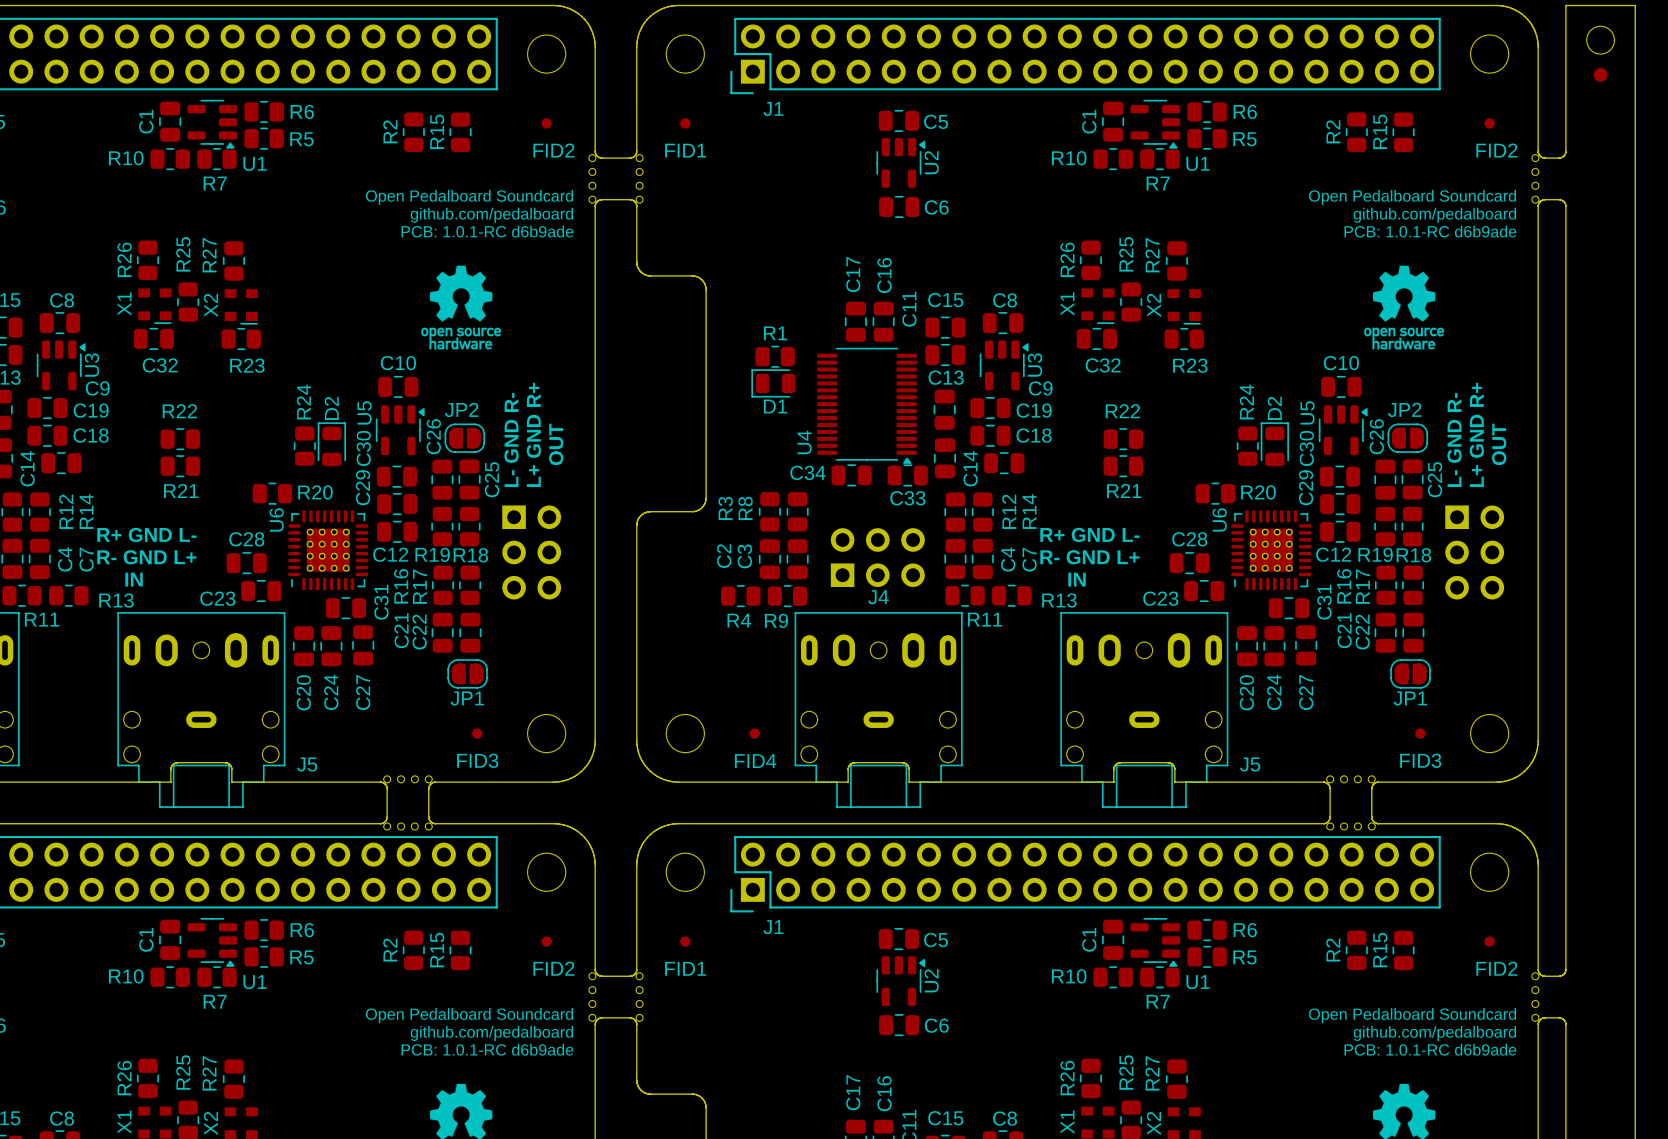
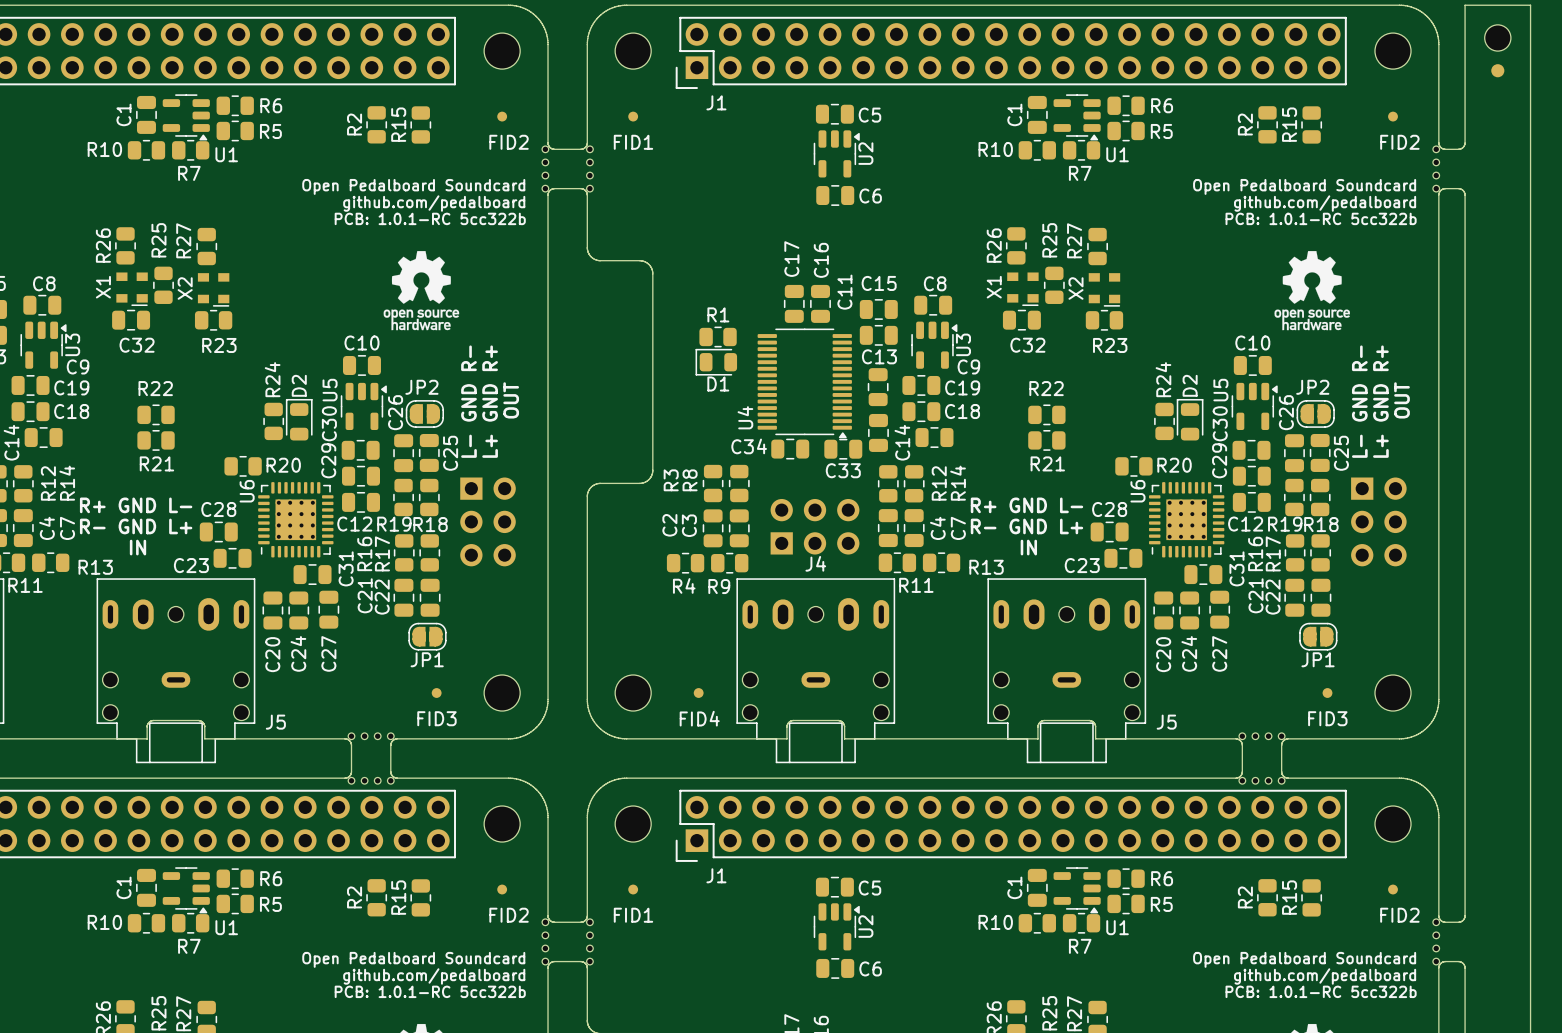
text: PCB: 1.0.1-RC d6b9ade (487, 231) -> PCB: 1.0.1-RC 5cc322b (430, 218)
text: PCB: 1.0.1-RC d6b9ade (1430, 231) -> PCB: 1.0.1-RC 5cc322b (1321, 218)
text: PCB: 1.0.1-RC d6b9ade (487, 1049) -> PCB: 1.0.1-RC 5cc322b (430, 991)
text: PCB: 1.0.1-RC d6b9ade (1430, 1049) -> PCB: 1.0.1-RC 5cc322b (1321, 991)

